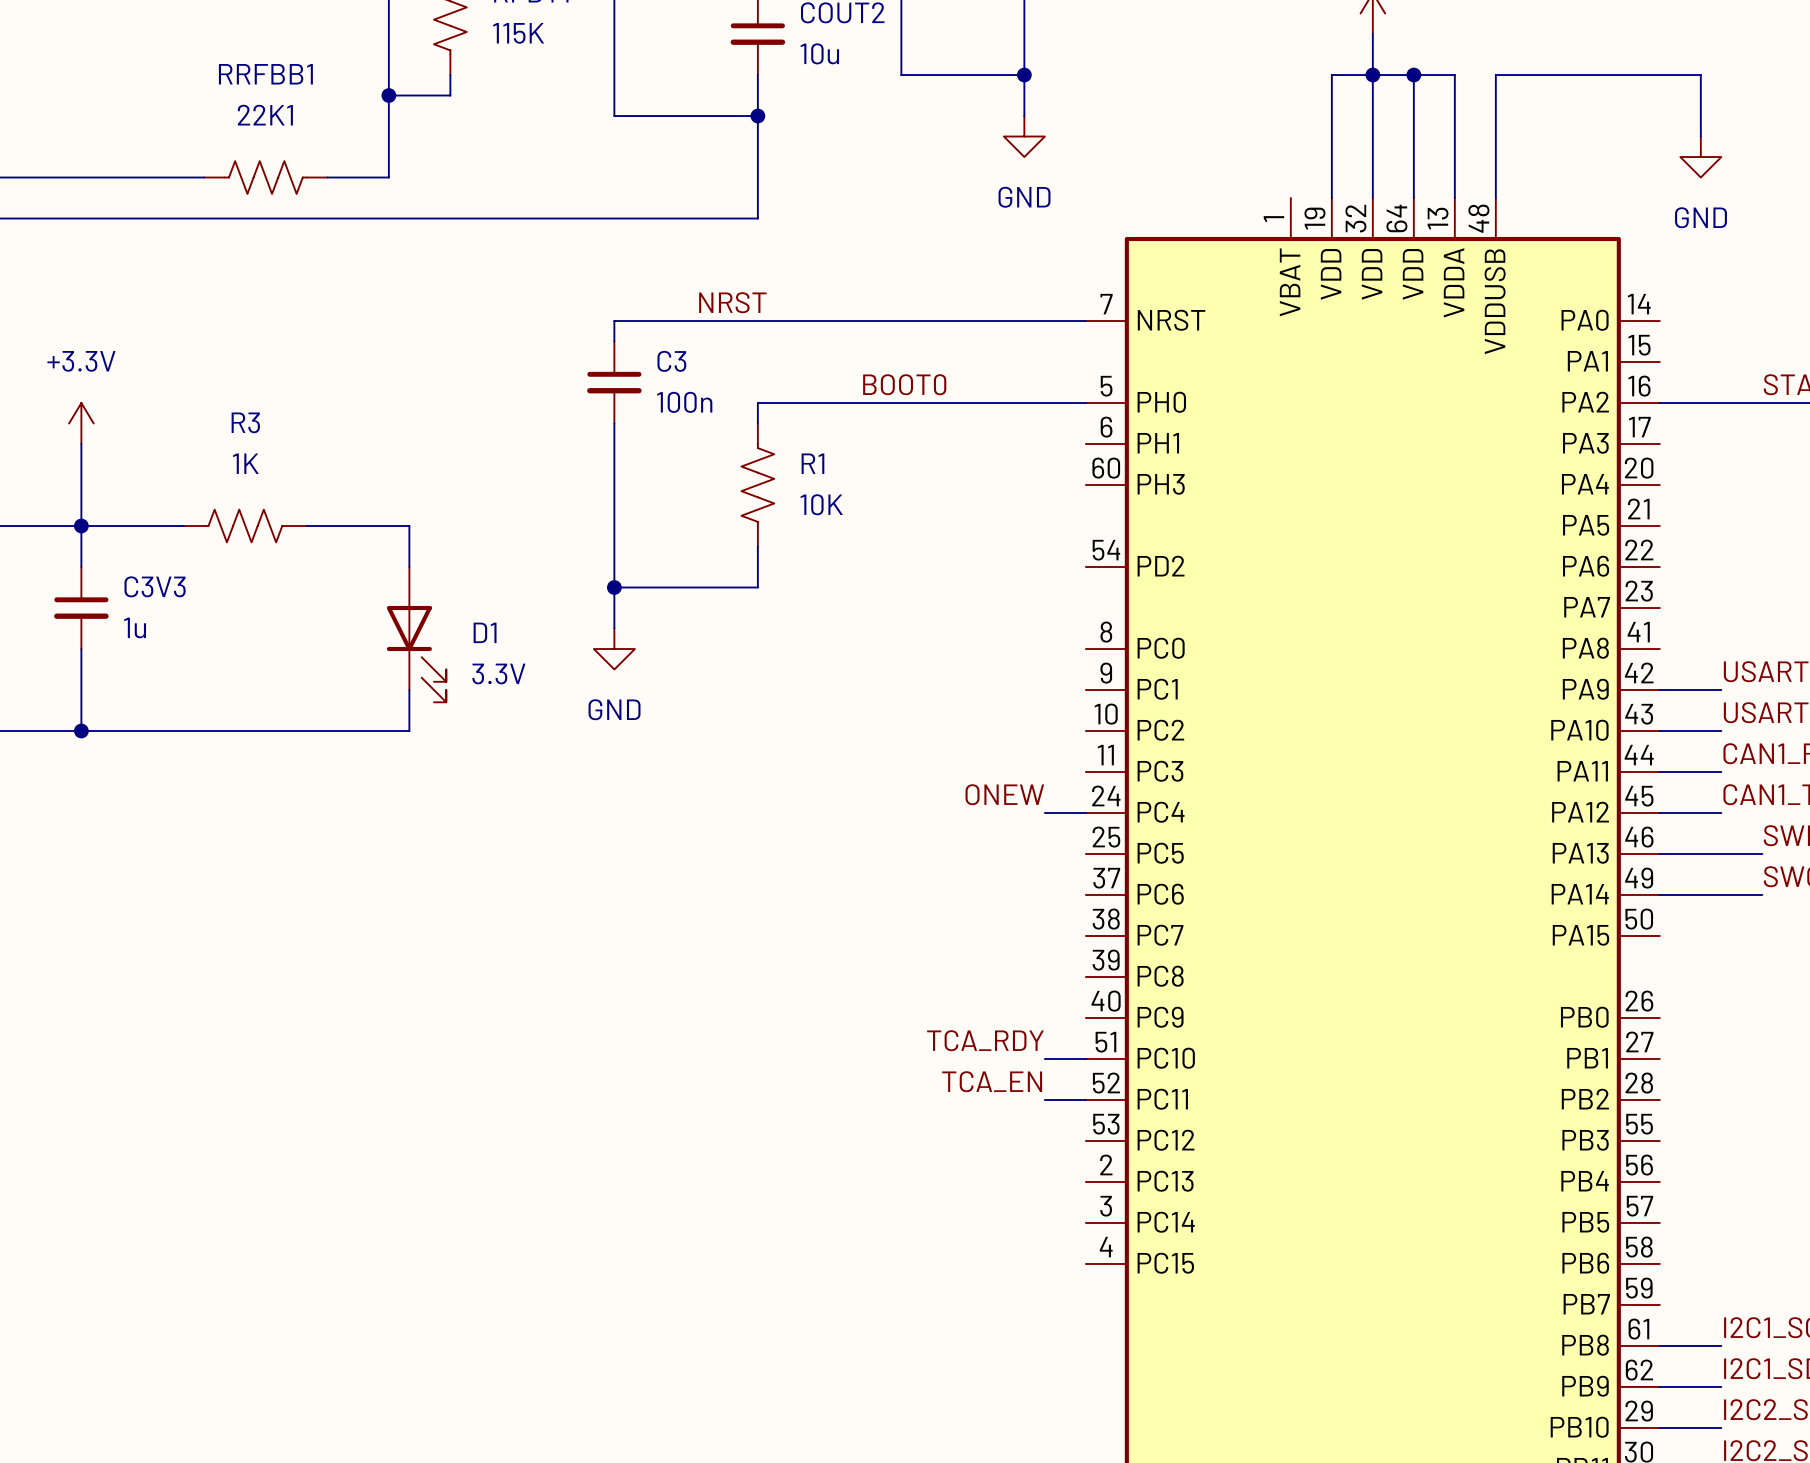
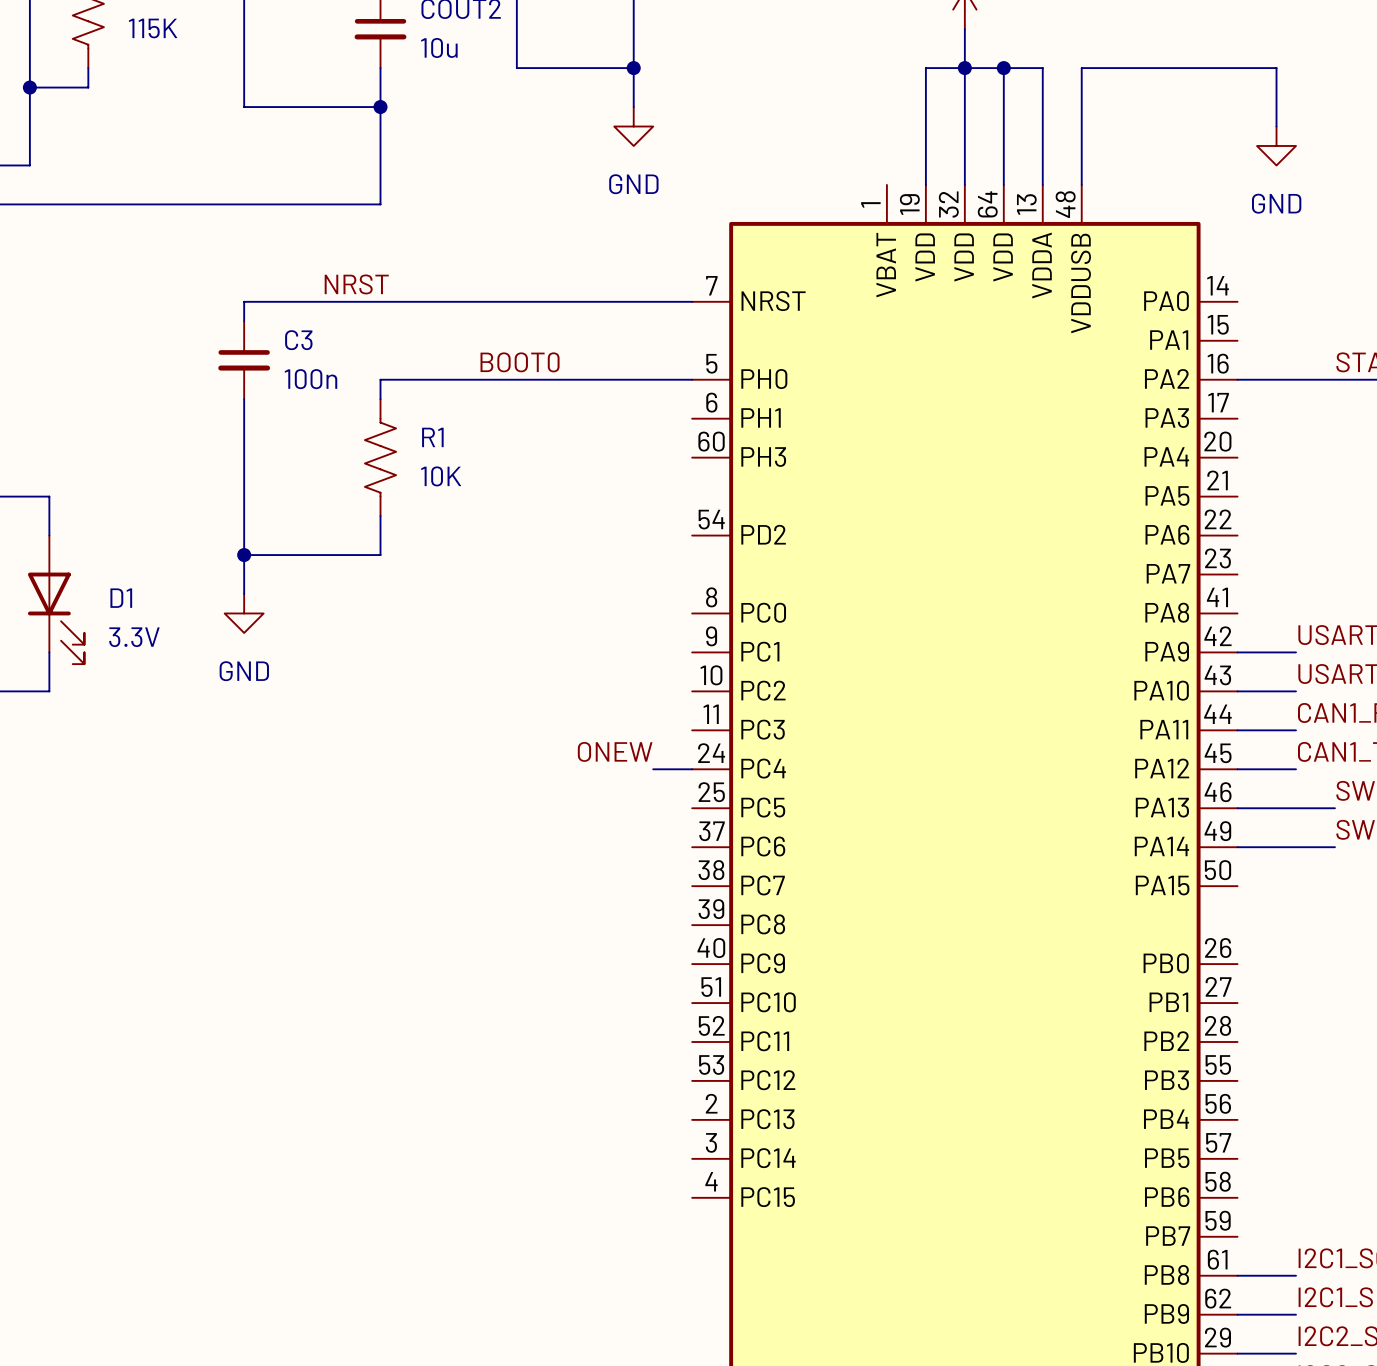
label: TCA_RDY (985, 1040) -> none
wire: (1044, 1058) (1085, 1058) -> none
label: TCA_EN (992, 1081) -> none
wire: (1044, 1099) (1085, 1099) -> none

